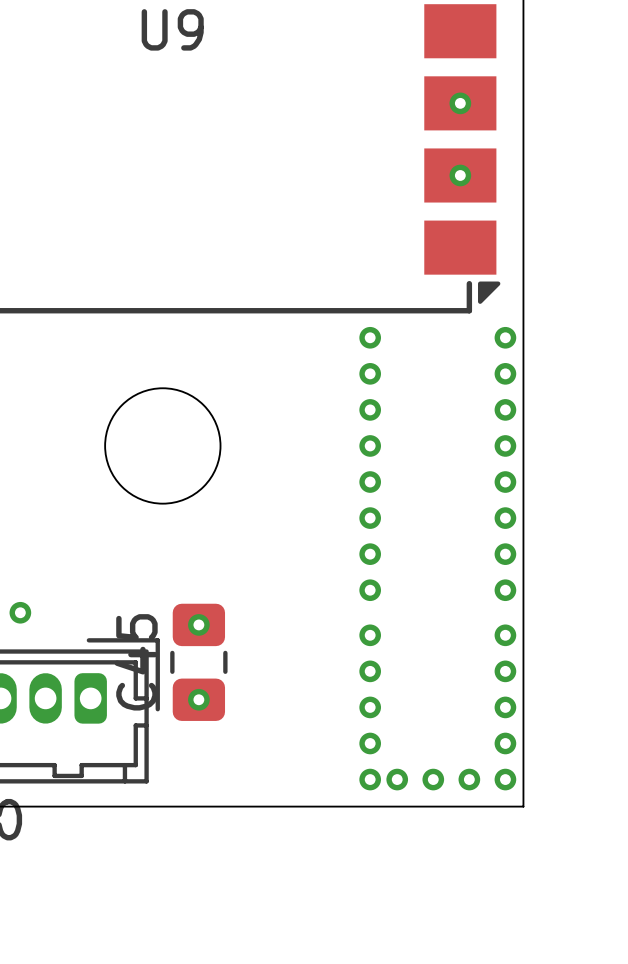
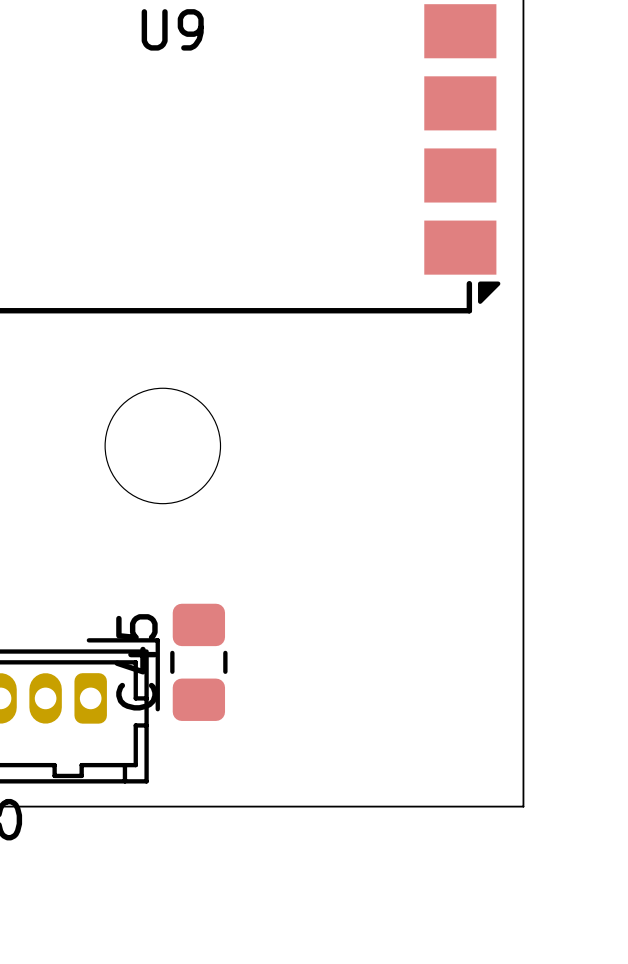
via: (460, 103) -> none
via: (460, 175) -> none
via: (370, 337) -> none
via: (505, 337) -> none
via: (370, 373) -> none
via: (505, 373) -> none
via: (370, 409) -> none
via: (505, 409) -> none
via: (370, 445) -> none
via: (505, 445) -> none
via: (370, 482) -> none
via: (505, 482) -> none
via: (370, 518) -> none
via: (505, 518) -> none
via: (370, 554) -> none
via: (505, 554) -> none
via: (370, 590) -> none
via: (505, 590) -> none
via: (20, 612) -> none
via: (198, 624) -> none
via: (370, 635) -> none
via: (505, 635) -> none
via: (370, 671) -> none
via: (505, 671) -> none
via: (198, 699) -> none
via: (370, 707) -> none
via: (505, 707) -> none
via: (370, 743) -> none
via: (505, 743) -> none
via: (370, 779) -> none
via: (397, 779) -> none
via: (433, 779) -> none
via: (469, 779) -> none
via: (505, 779) -> none

